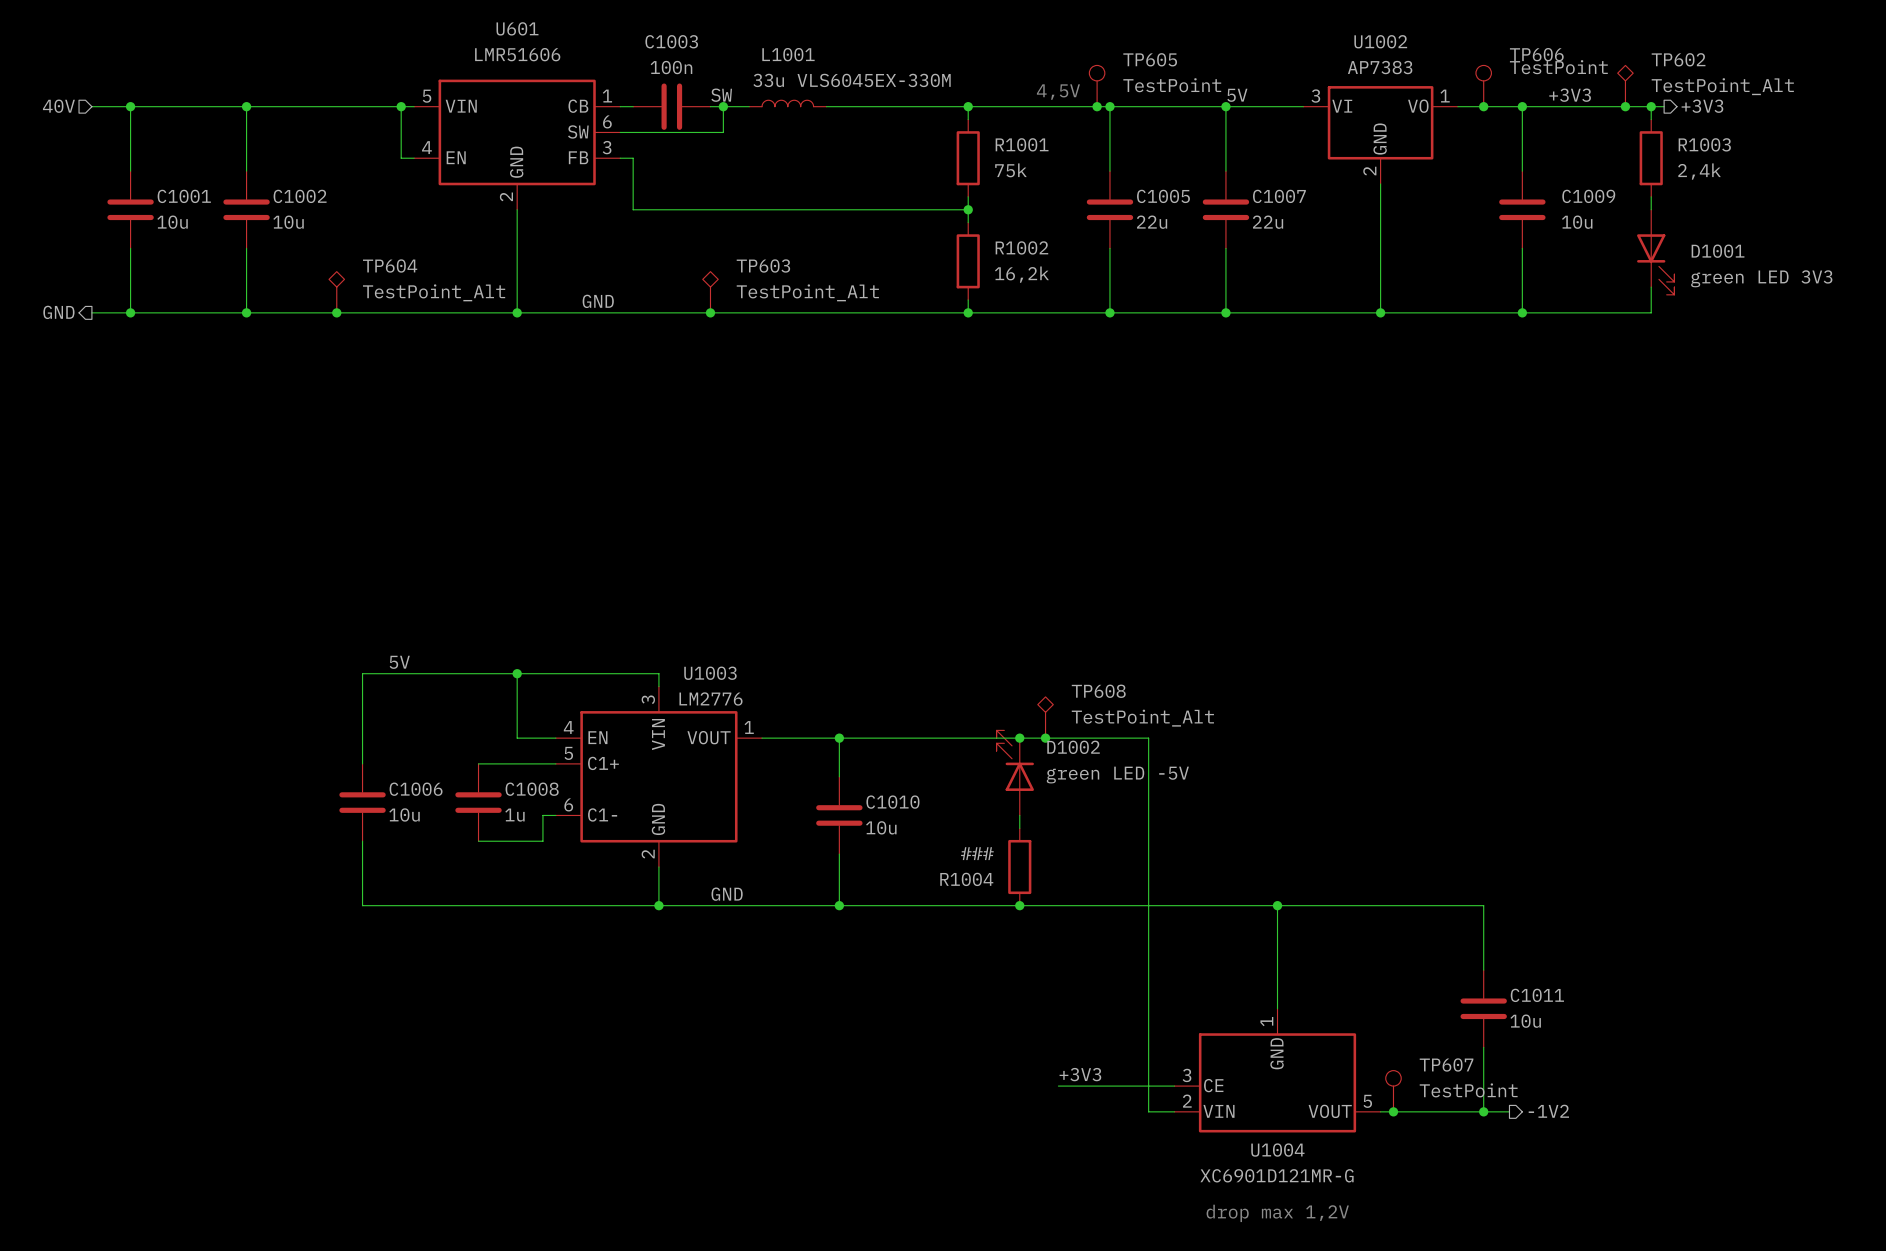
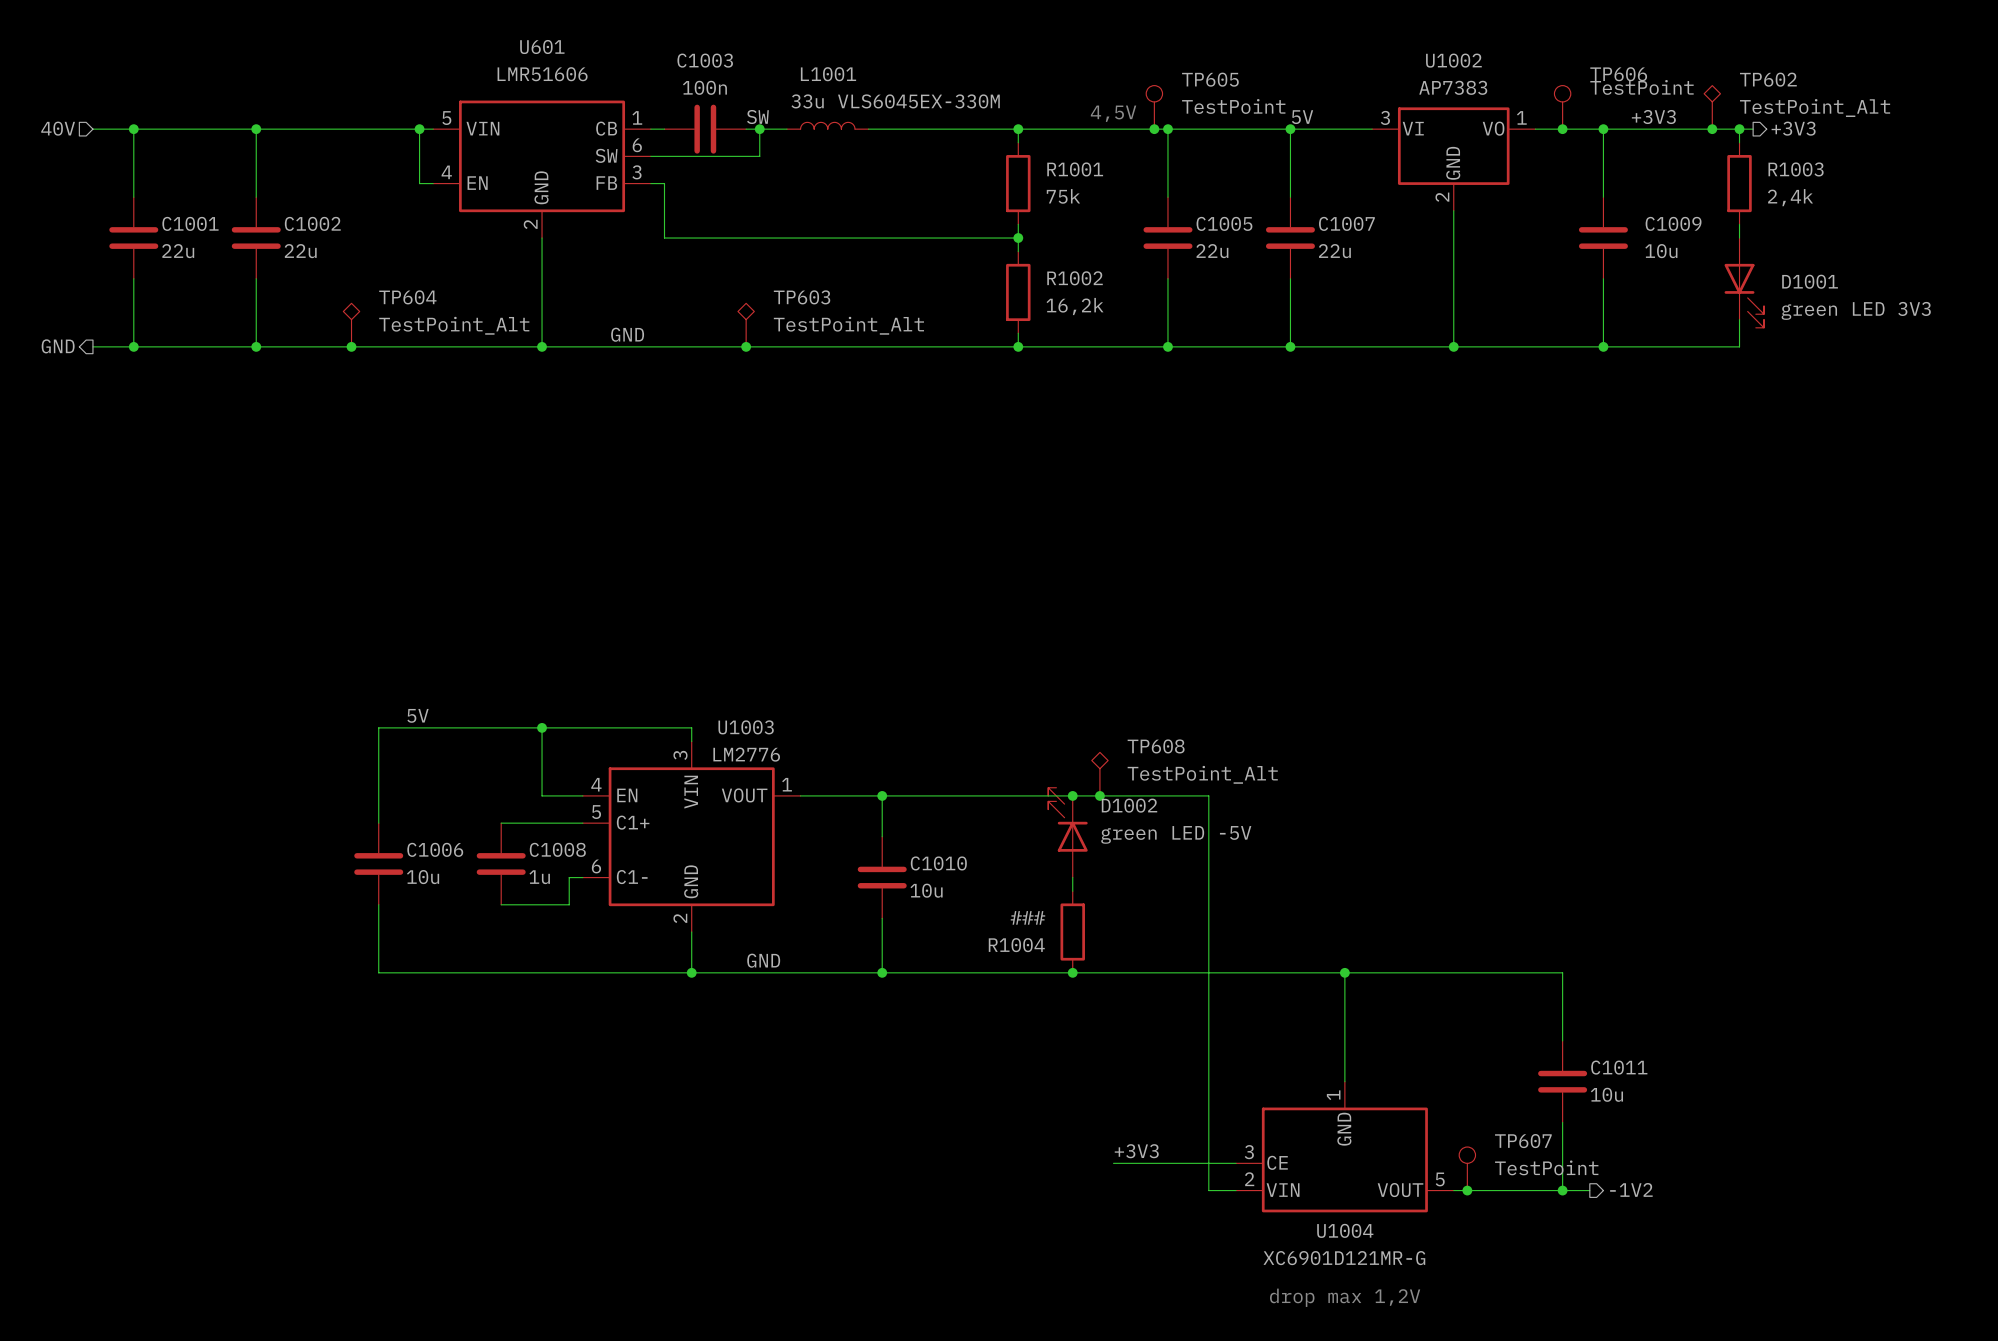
C1001 value: 10u (172, 222) -> 22u (178, 251)
C1002 value: 10u (288, 222) -> 22u (300, 251)

